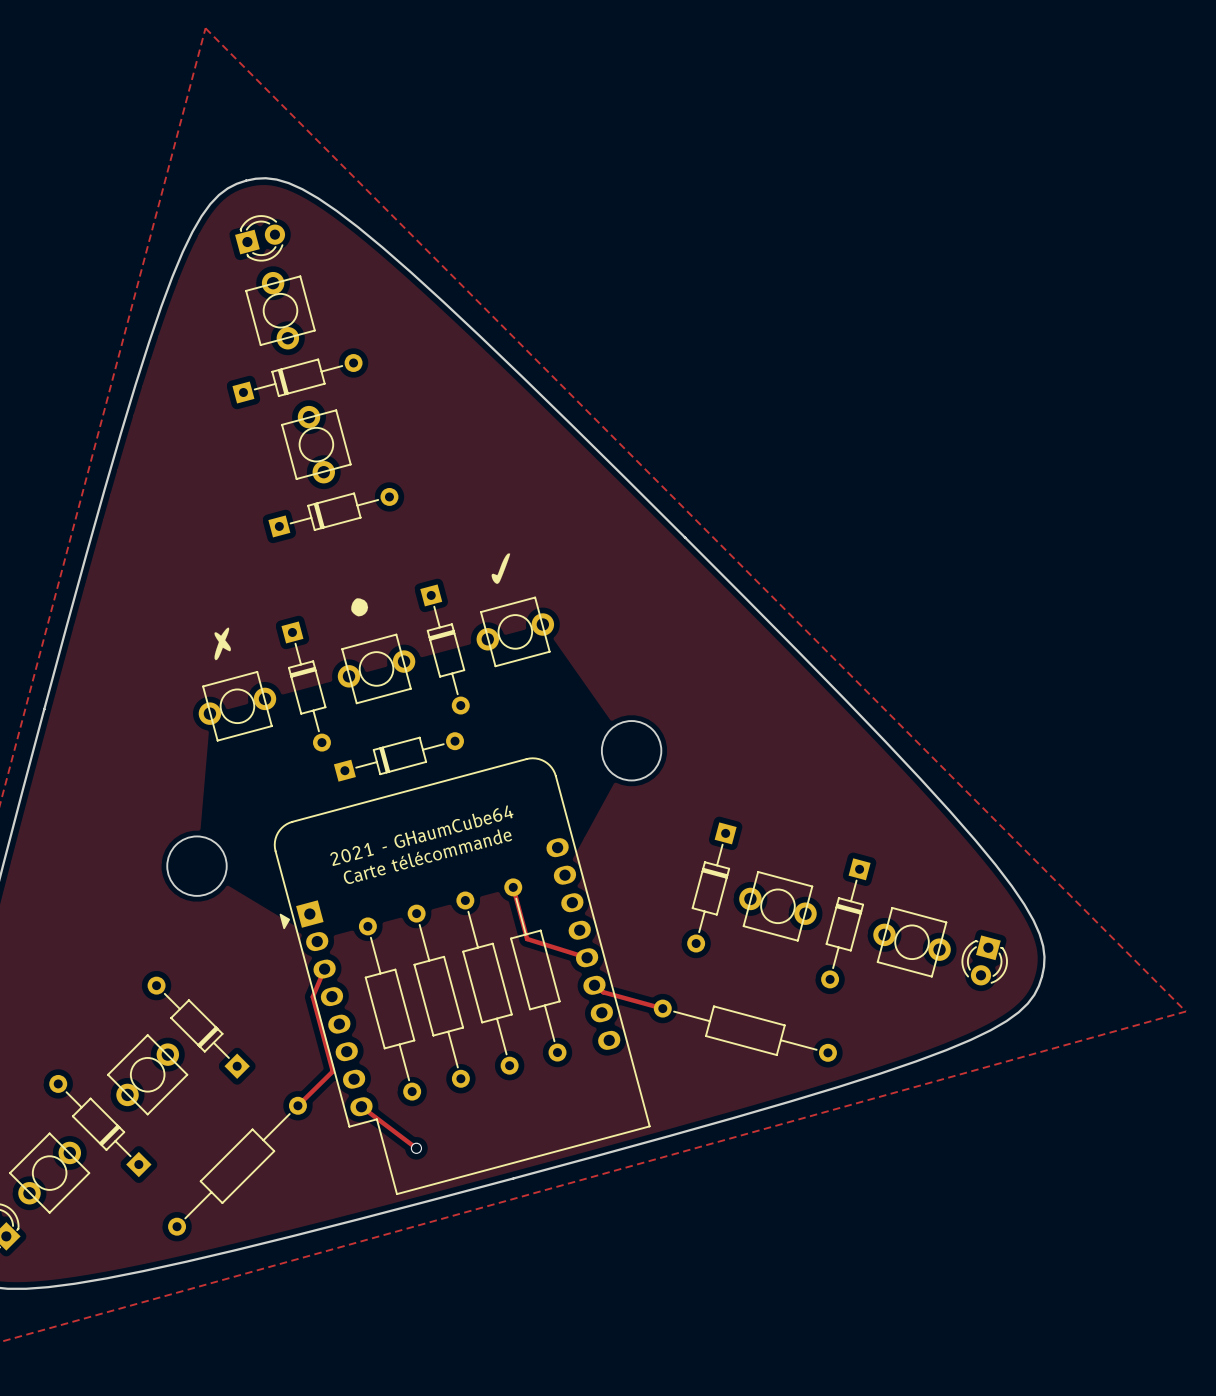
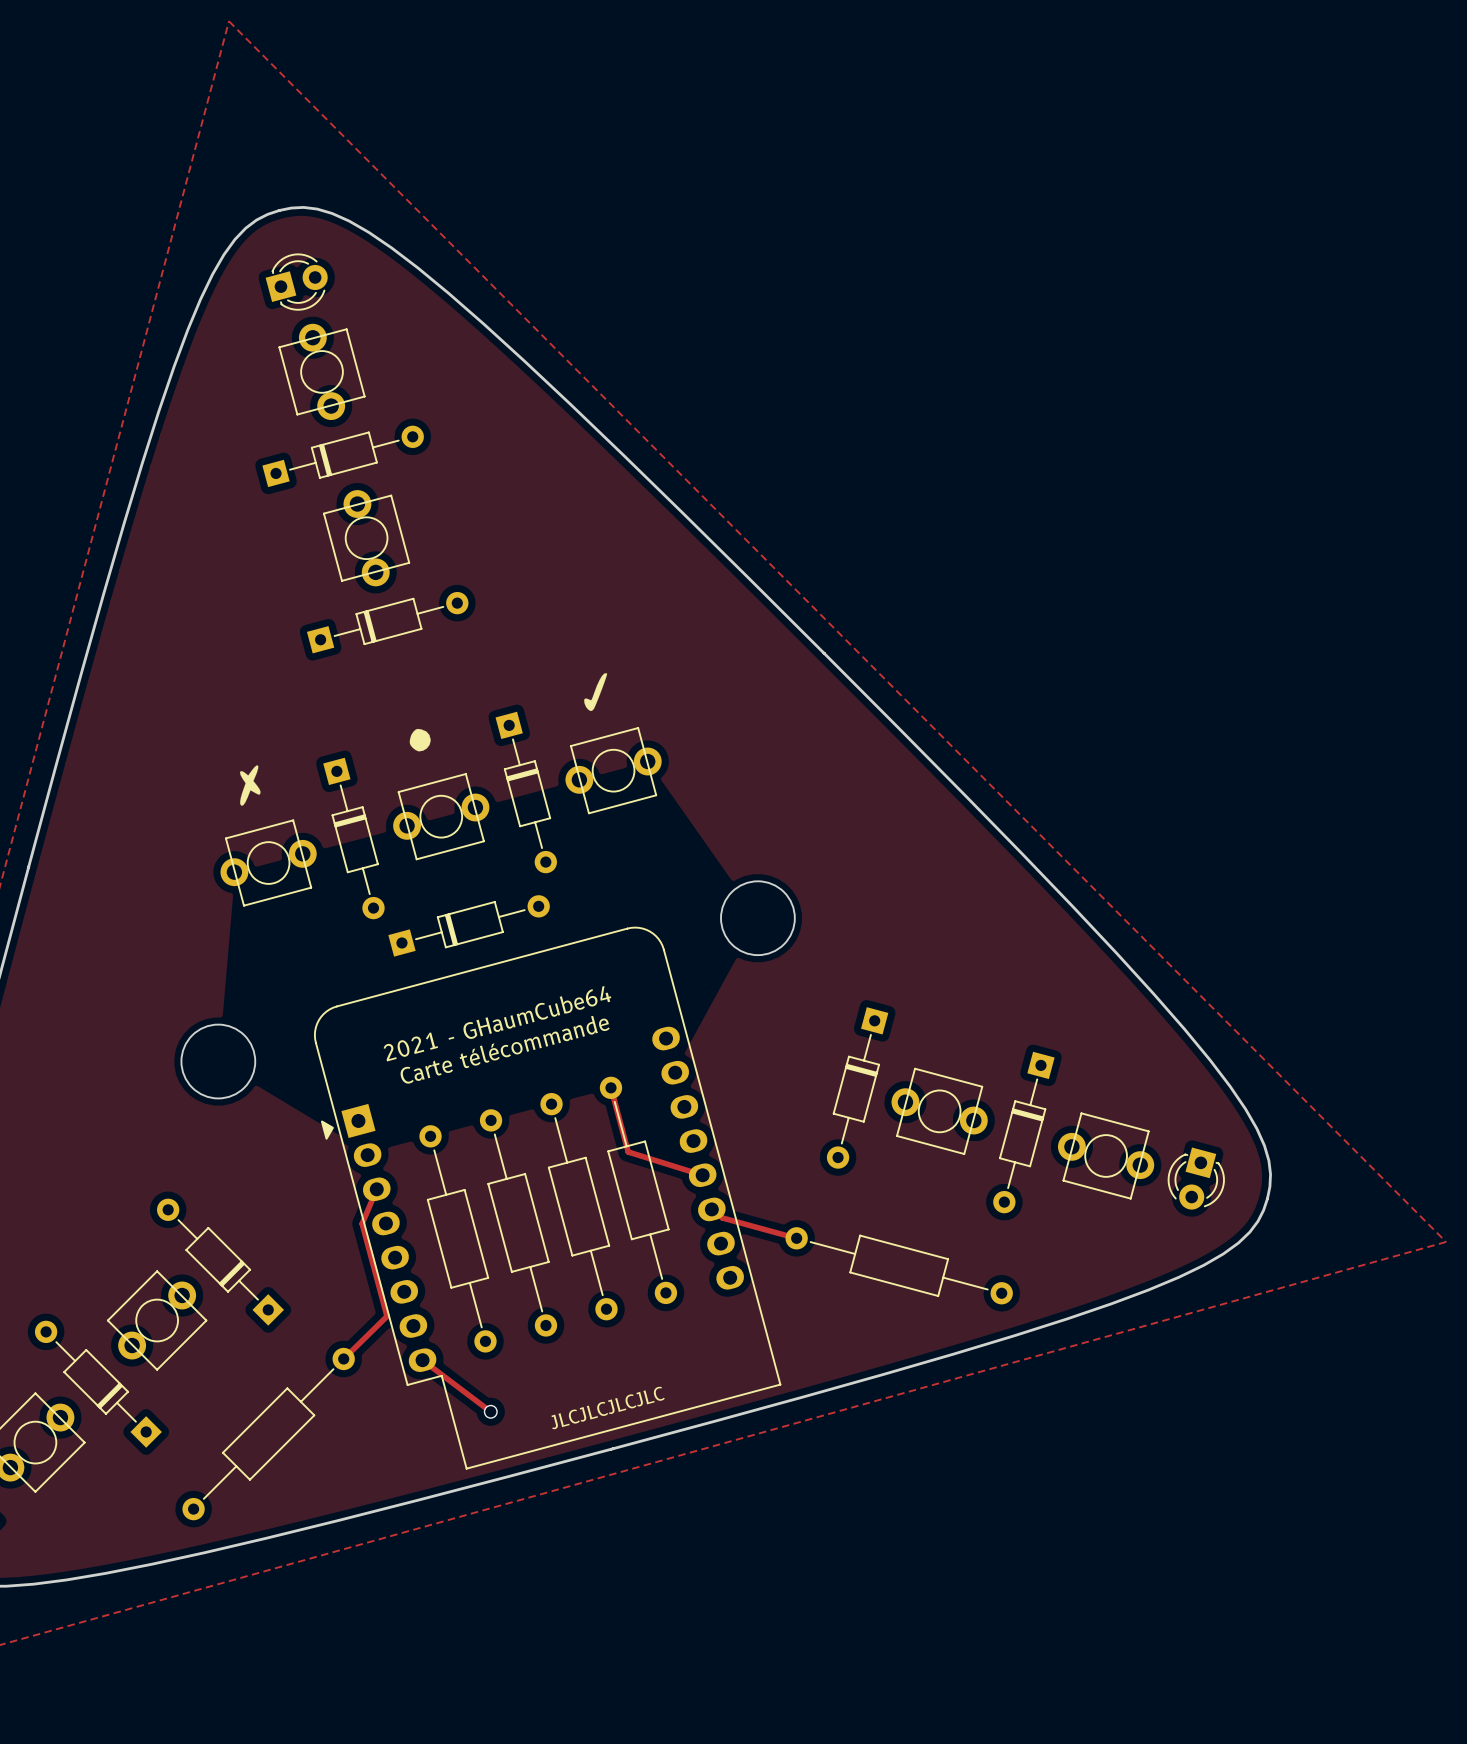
text: none -> JLCJLCJLCJLC (608, 1408)

